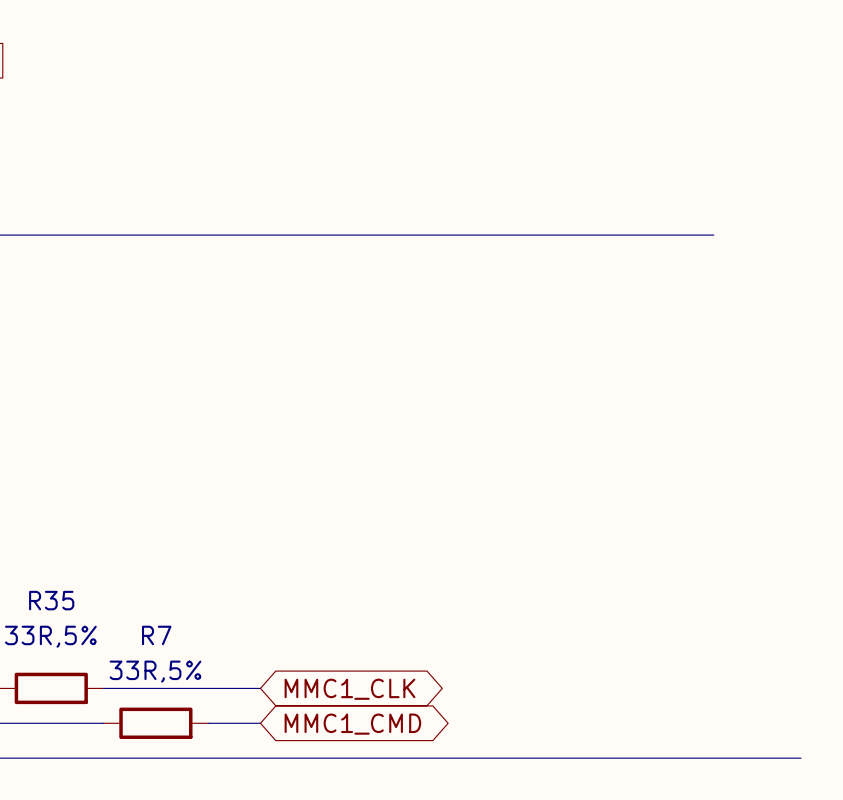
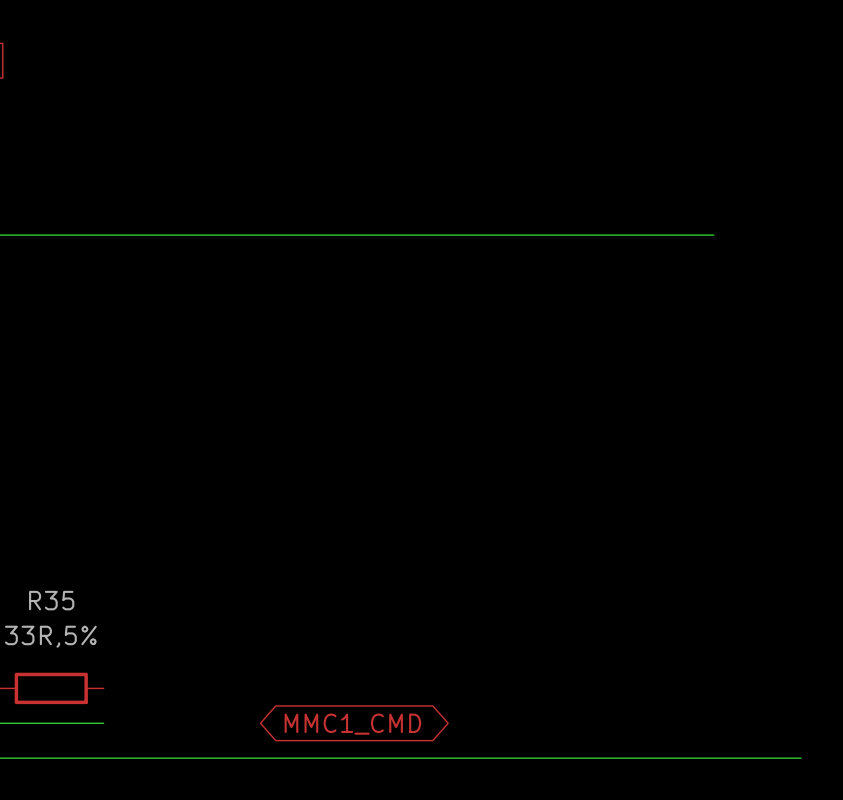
wire: (103, 688) (260, 688) -> none
global label: MMC1_CLK (349, 689) -> none
R7: 33R,5% (155, 723) -> none
wire: (208, 723) (260, 723) -> none

